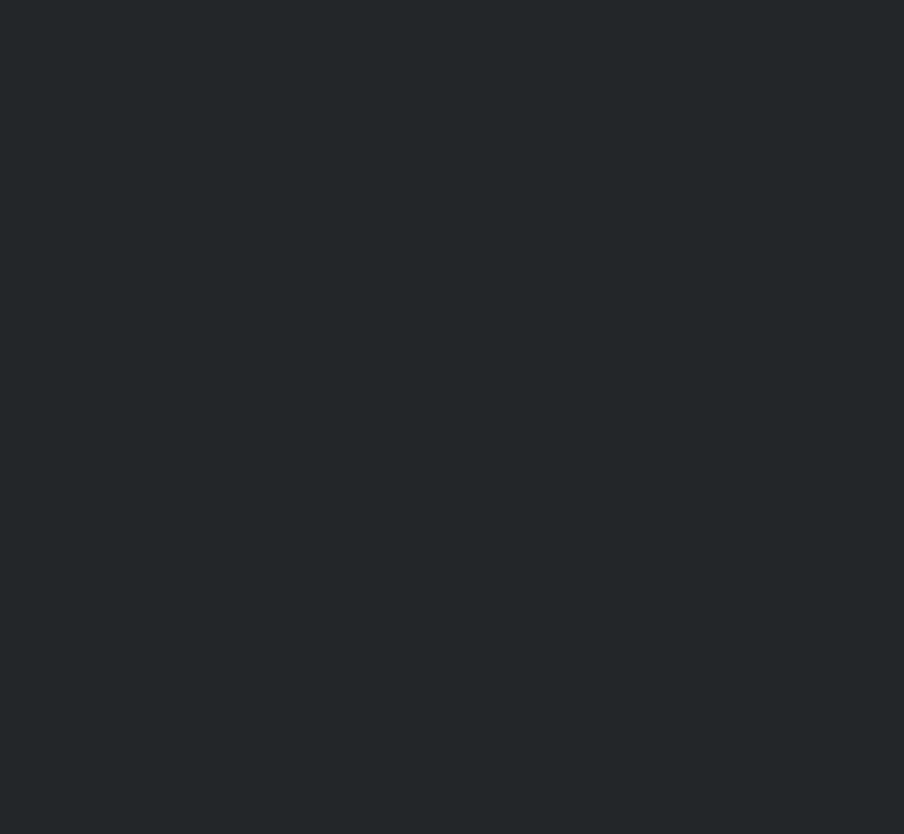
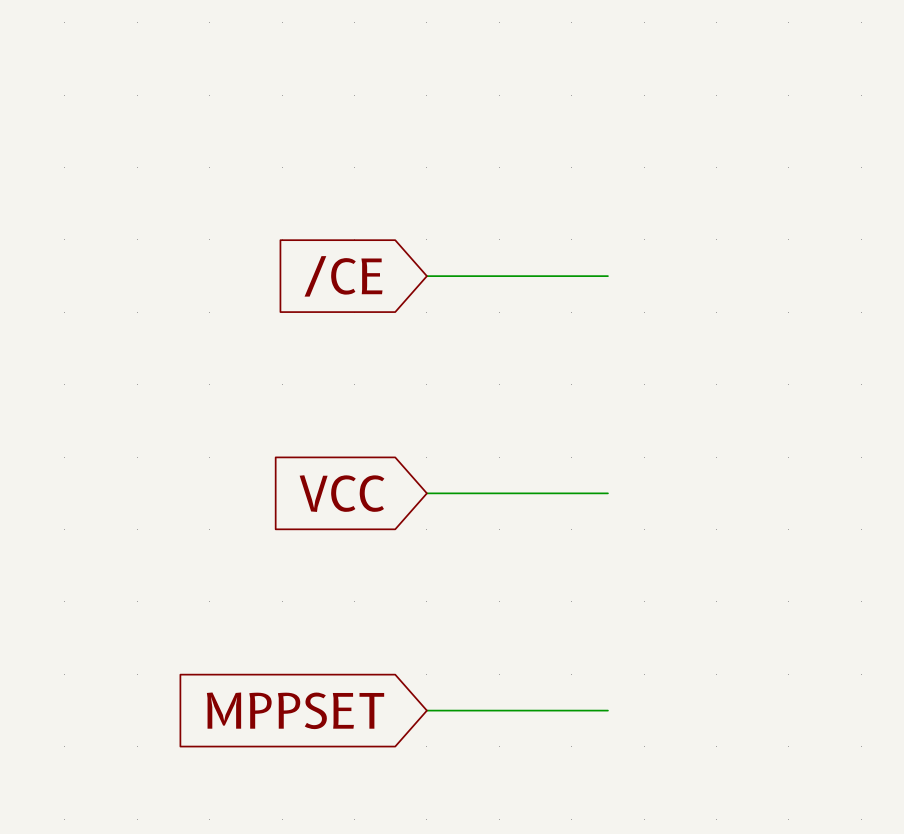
wire: none -> (426, 276) (607, 276)
global label: none -> /CE (343, 276)
global label: none -> VCC (342, 493)
wire: none -> (426, 493) (607, 493)
global label: none -> MPPSET (295, 710)
wire: none -> (426, 710) (607, 710)

